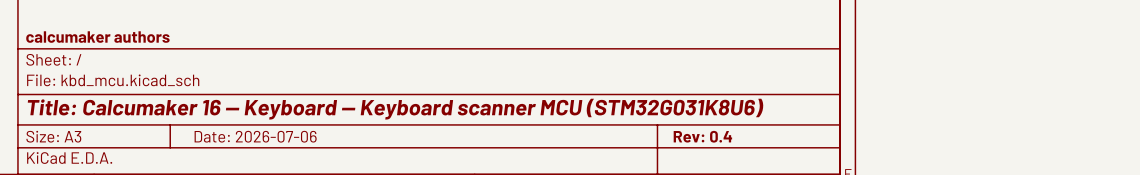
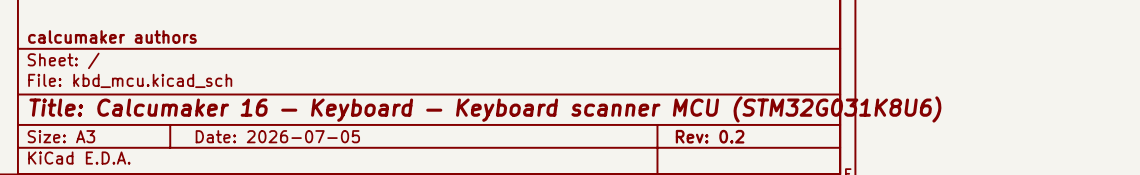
title block: Date: 2026-07-06 (255, 136) -> Date: 2026-07-05 (277, 136)
title block: Rev: 0.4 (702, 136) -> Rev: 0.2 (710, 136)

